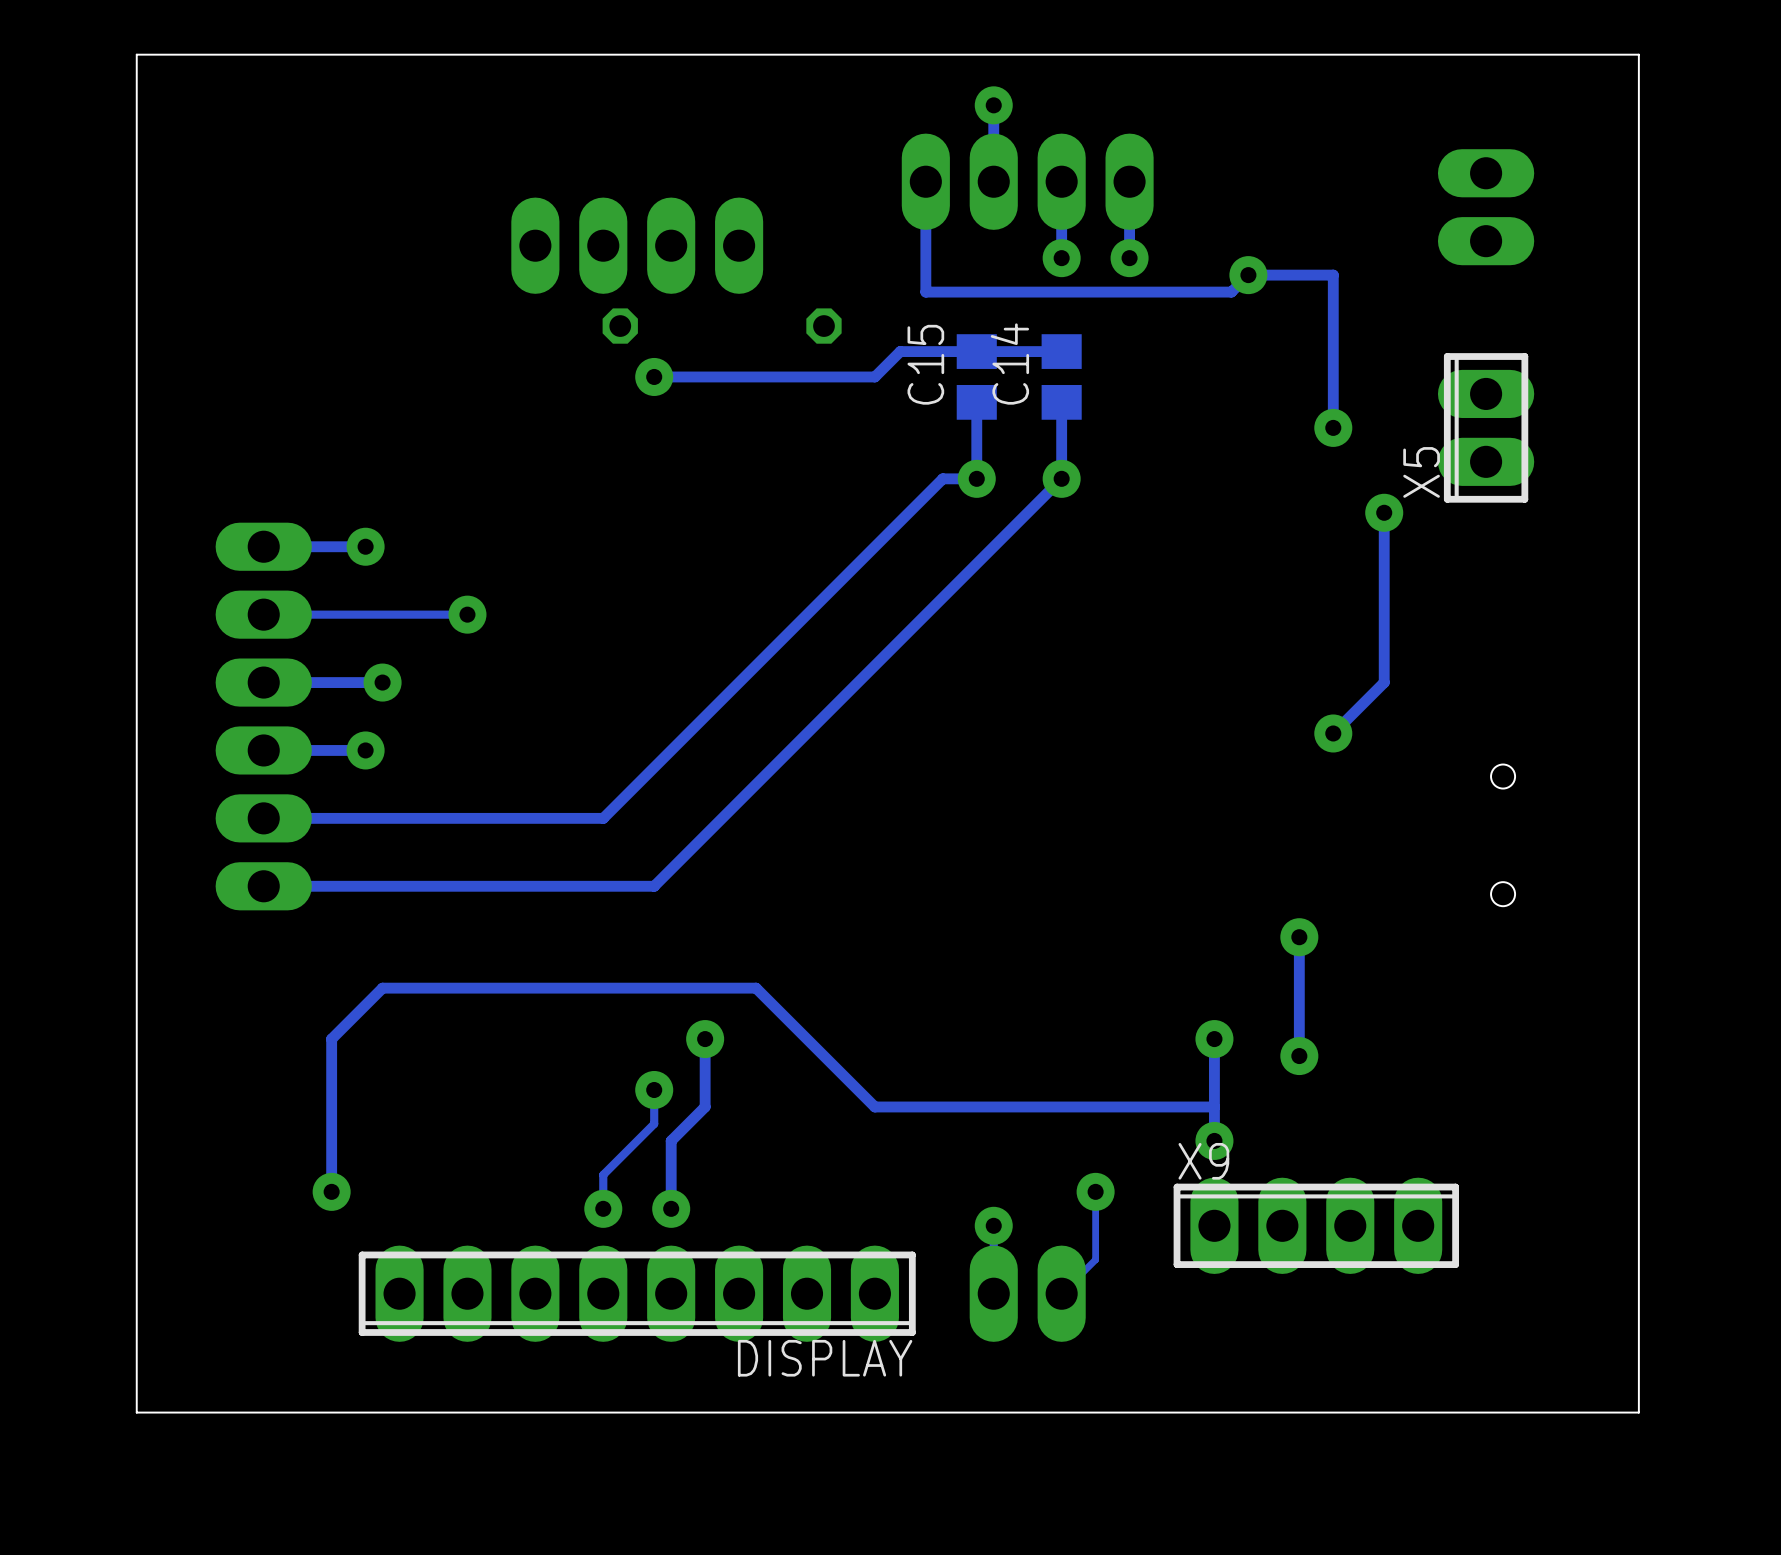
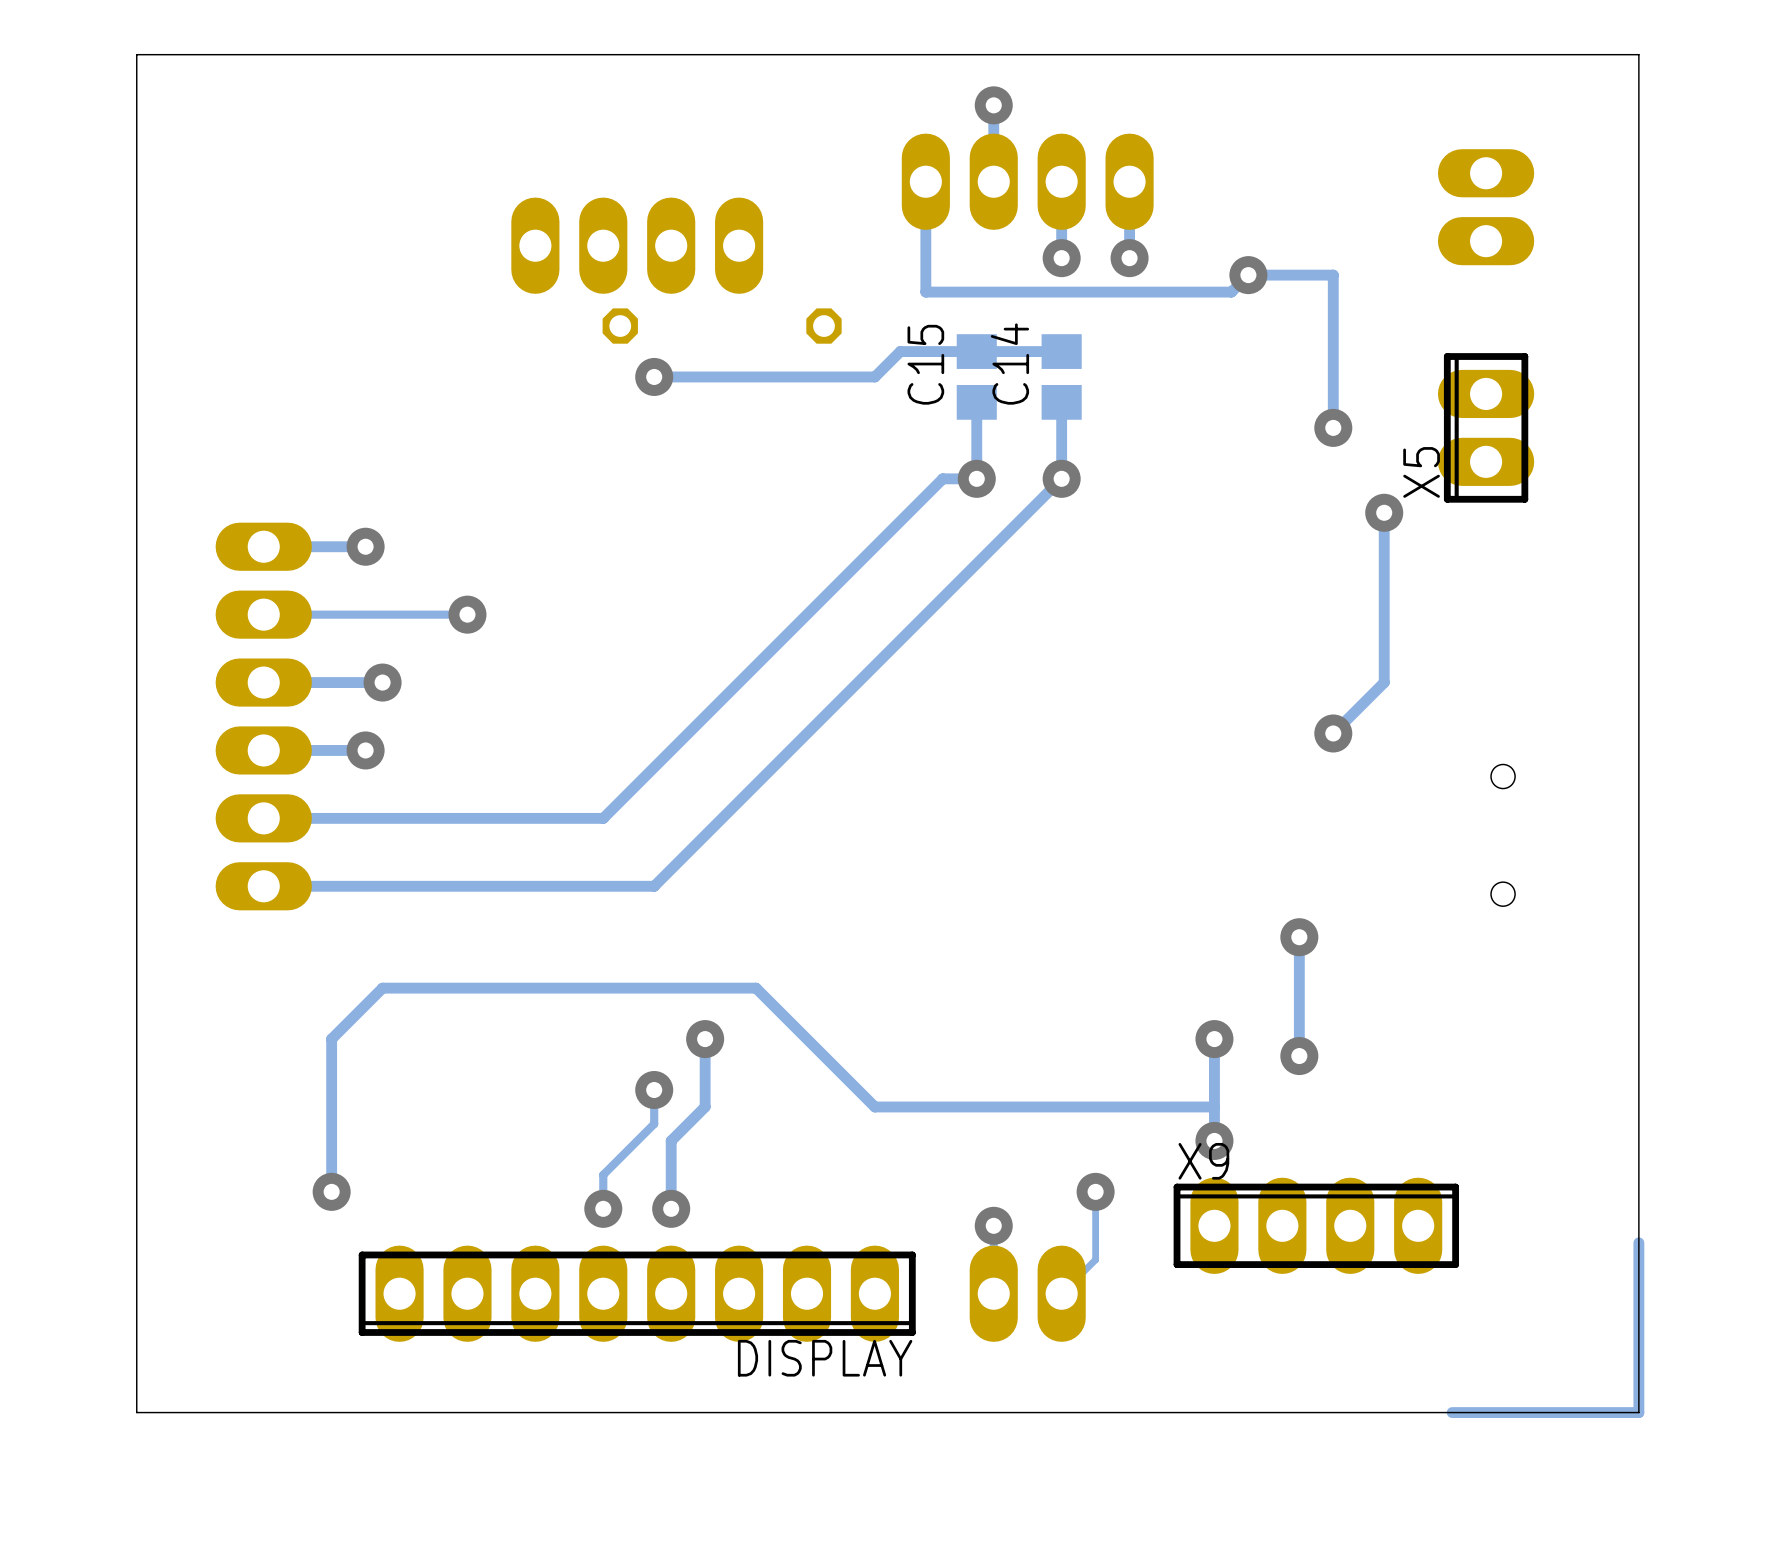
track: none -> (1638, 1242) (1638, 1412) (1452, 1412)

